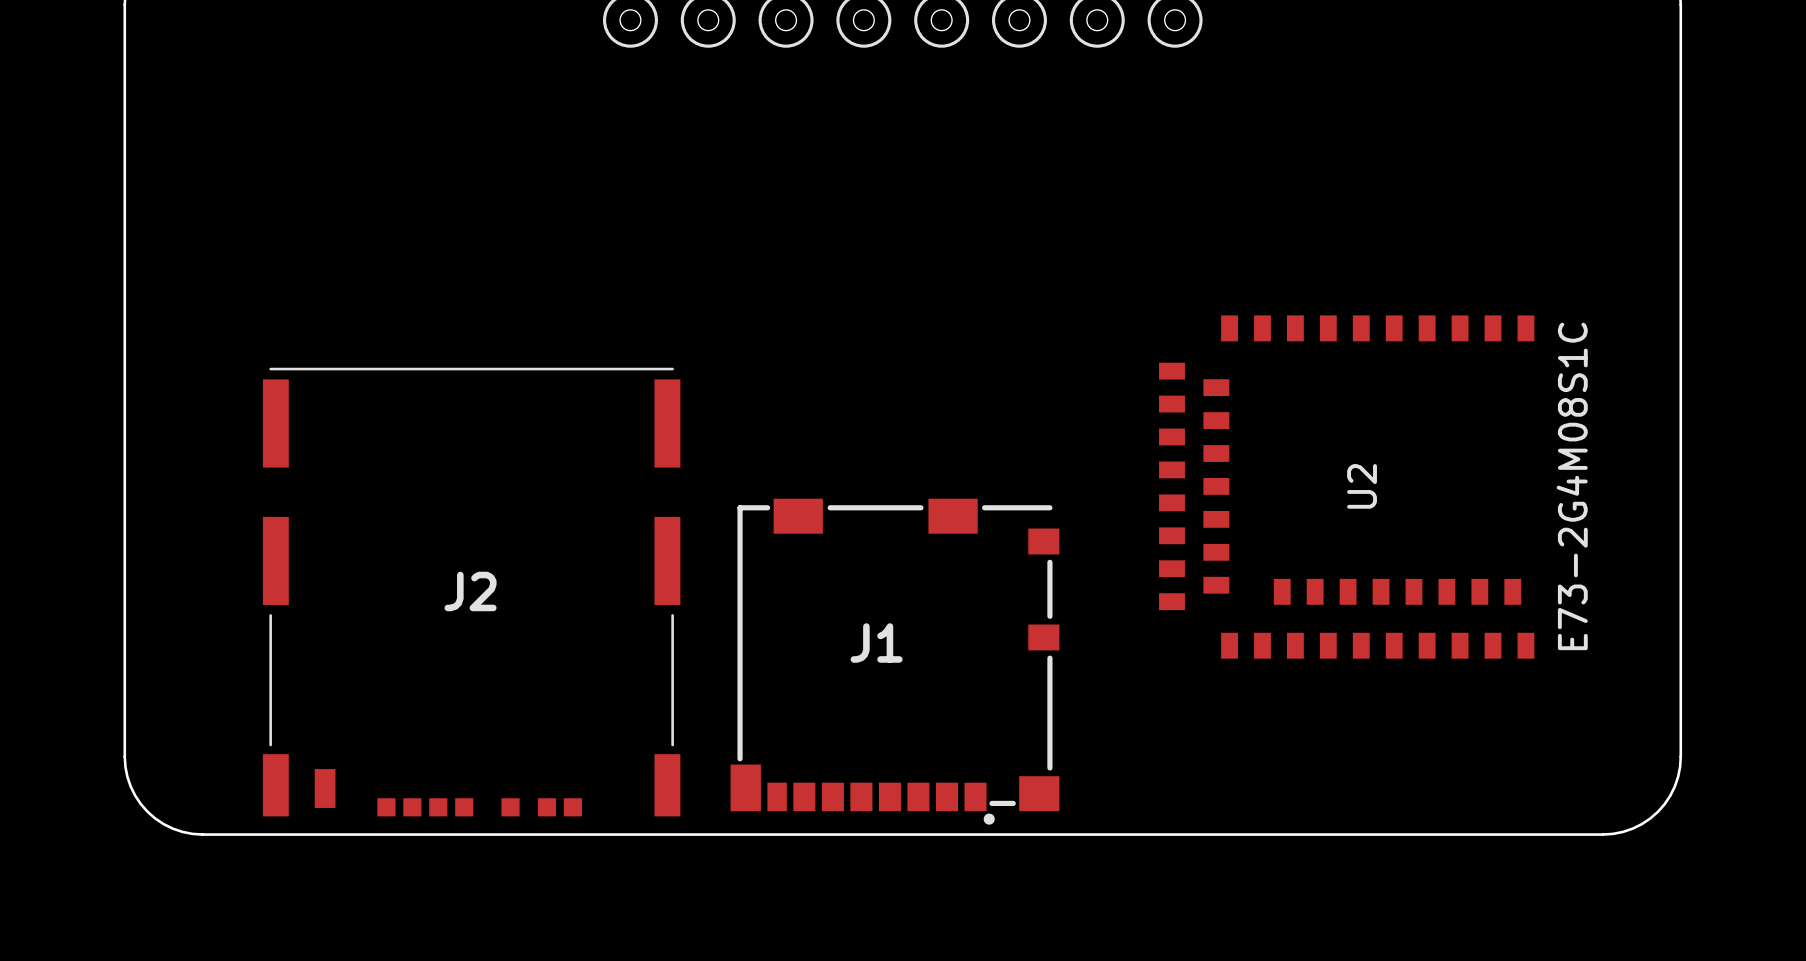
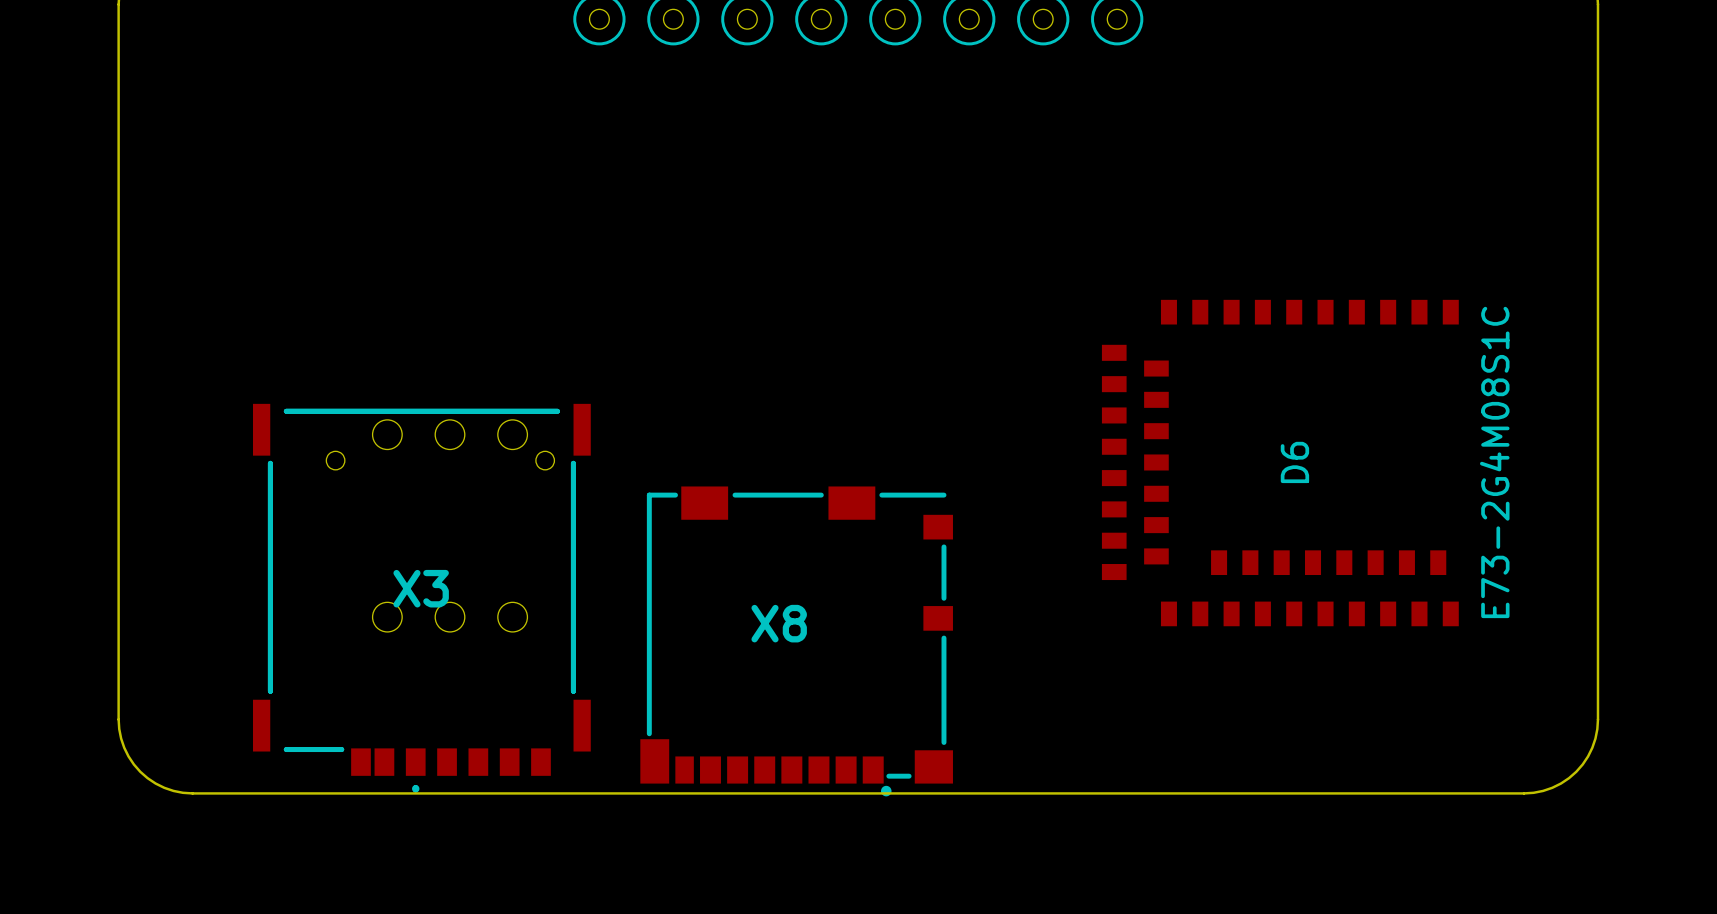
U2 name: U2 (1362, 486) -> D6 (1294, 462)
J2: (471, 592) -> none
X3: none -> (421, 598)
J1: (894, 661) -> none
X8: none -> (796, 641)

